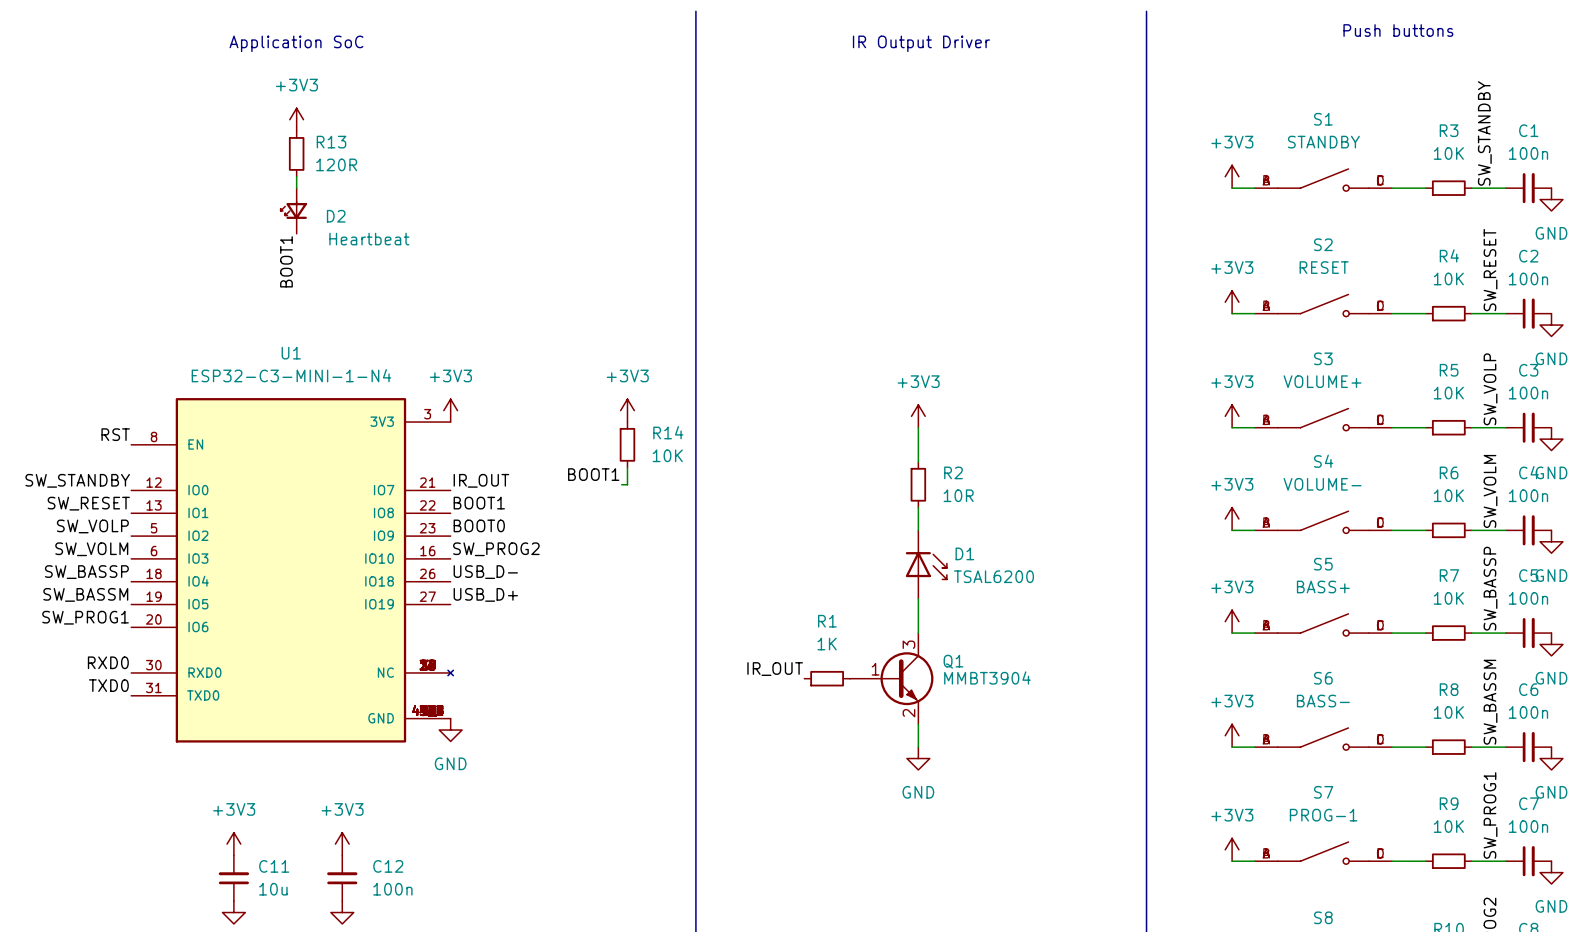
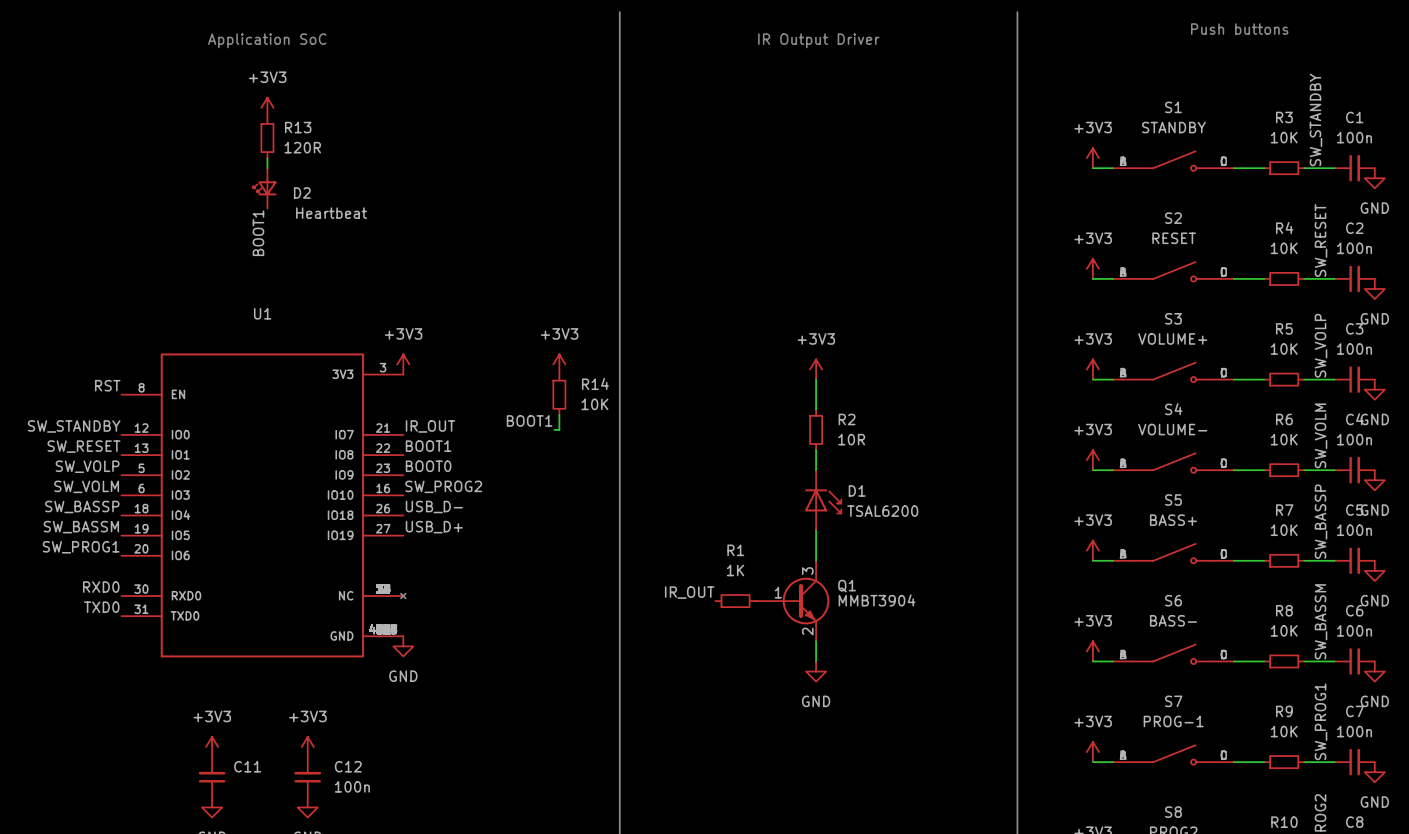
U1 value: ESP32-C3-MINI-1-N4 (291, 375) -> none
C11 value: 10u (273, 889) -> none

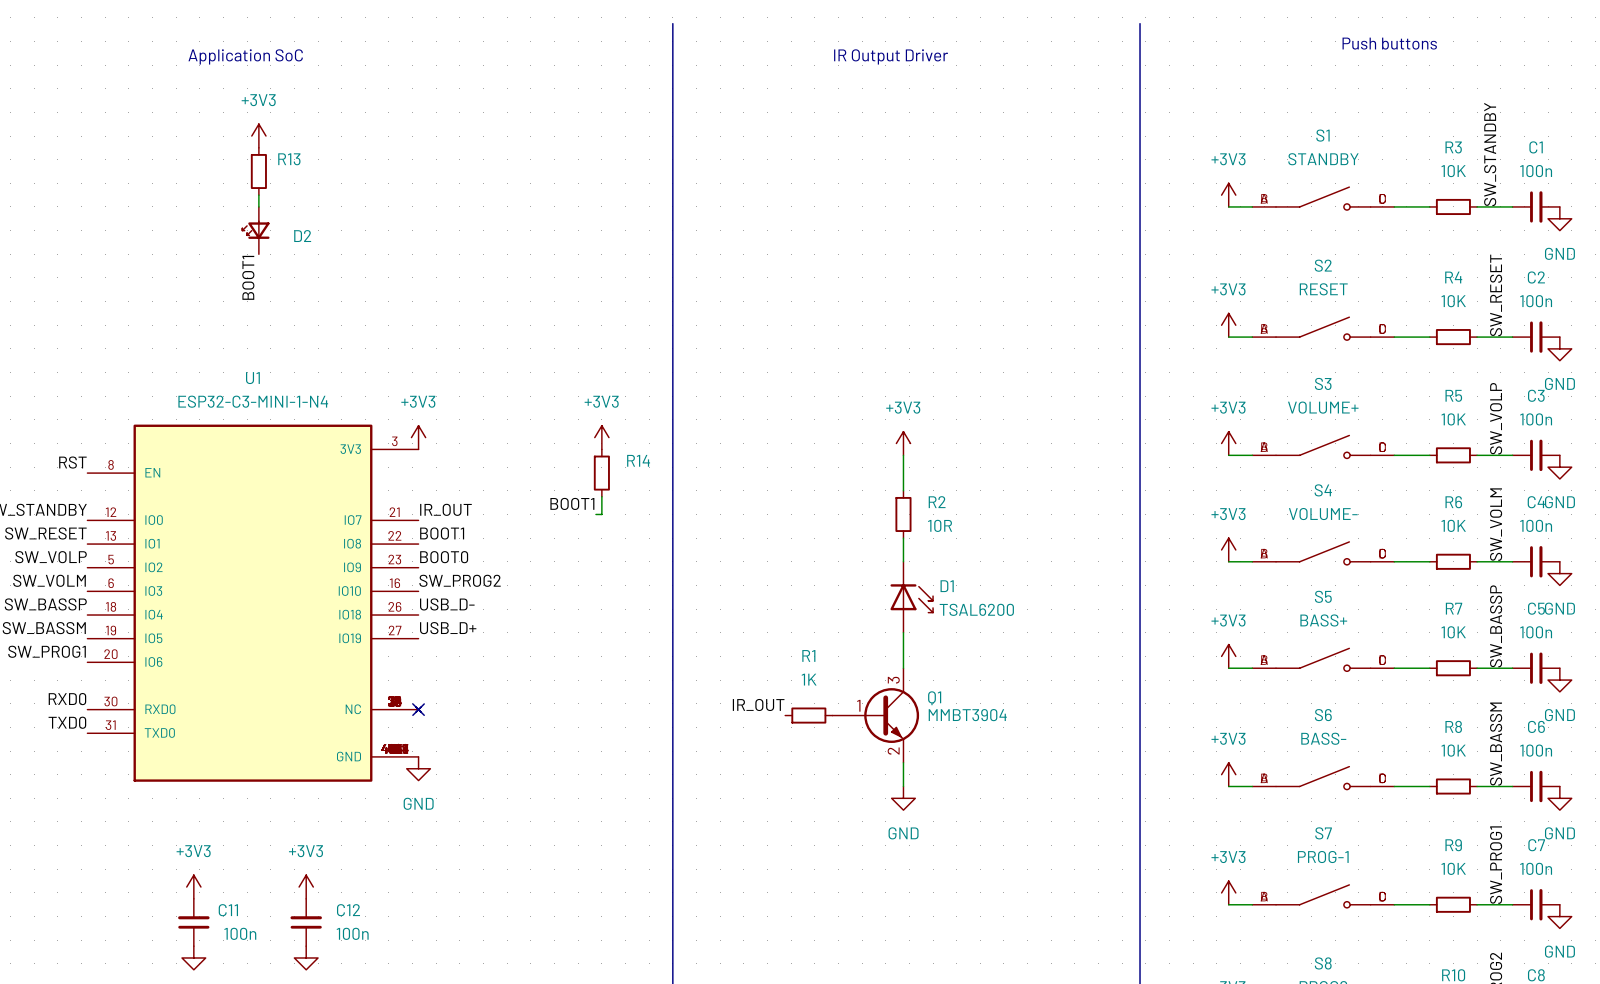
R13 value: 120R (302, 147) -> none
D2 value: Heartbeat (331, 213) -> none
U1 value: none -> ESP32-C3-MINI-1-N4 (253, 401)
R14 value: 10K (594, 404) -> none
no-connect mark: none -> (418, 709)
C11 value: none -> 100n (240, 933)

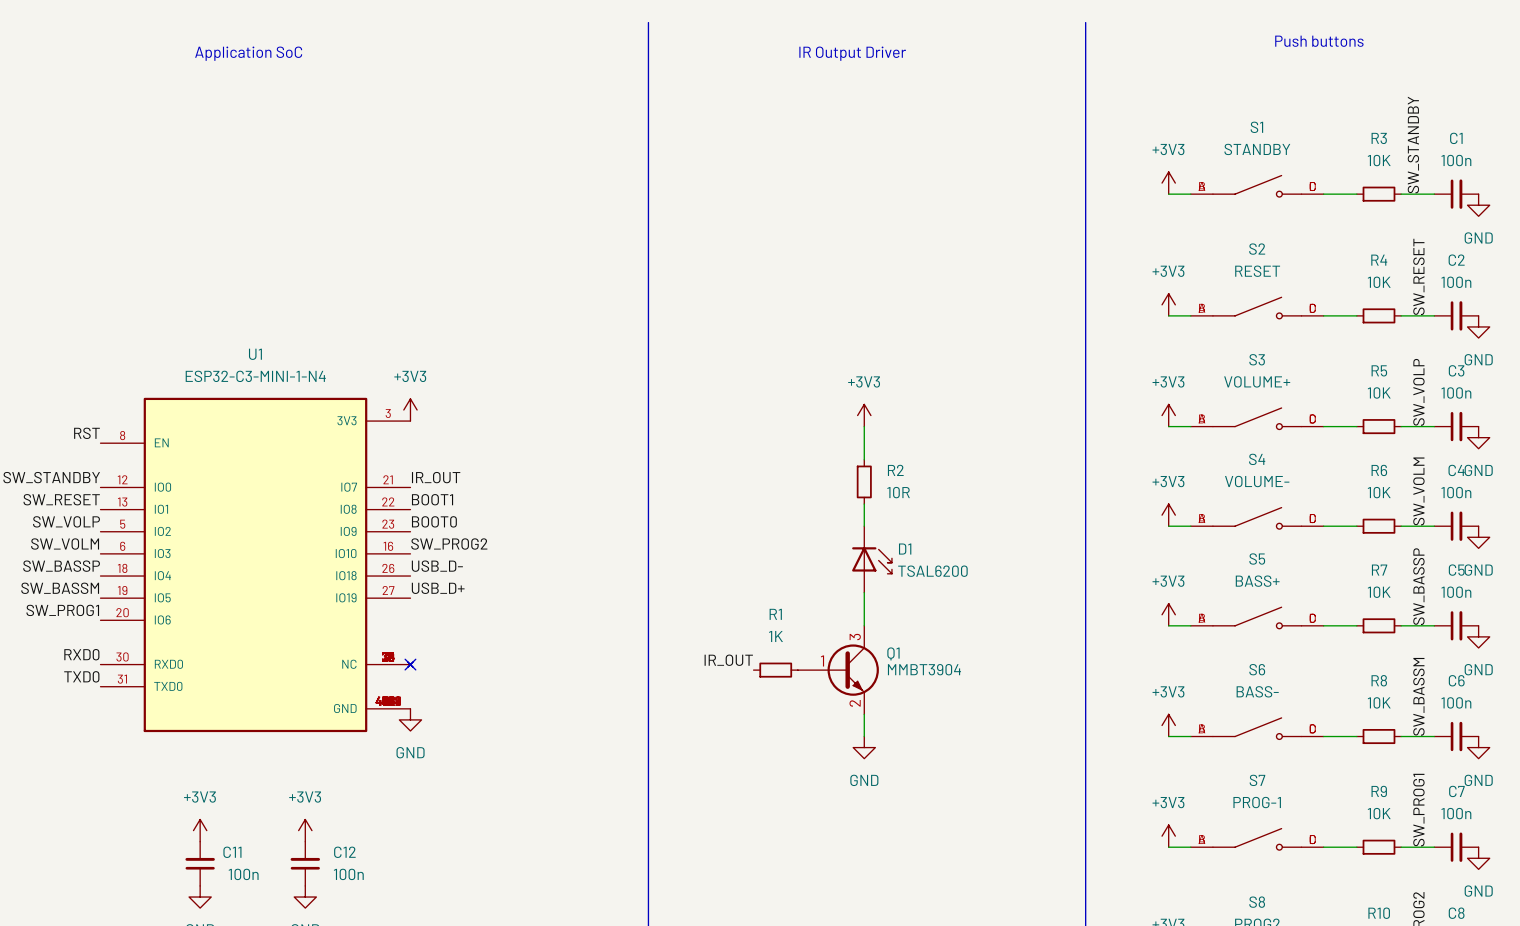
power symbol: +3V3 (258, 136) -> none
R13: (258, 171) -> none
wire: (258, 195) (258, 206) -> none
D2: (255, 230) -> none
label: BOOT1 (248, 277) -> none
power symbol: +3V3 (601, 437) -> none
R14: (601, 473) -> none
wire: (601, 496) (601, 514) (595, 514) -> none
label: BOOT1 (572, 503) -> none

